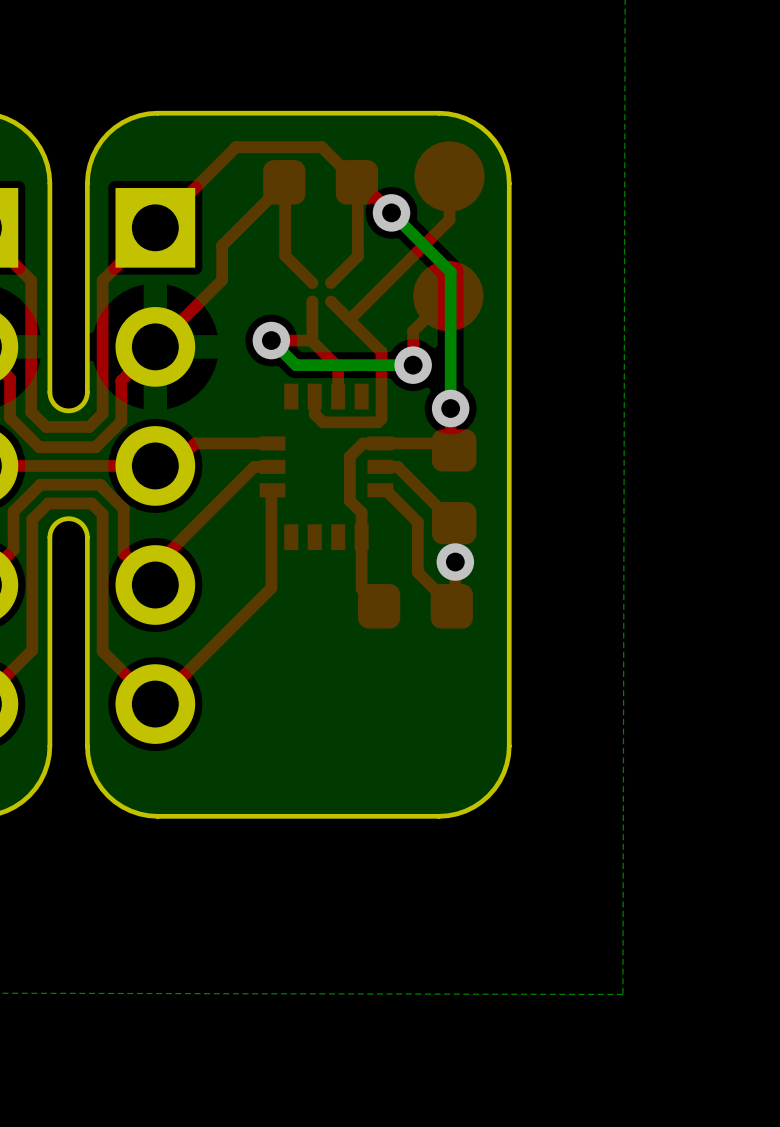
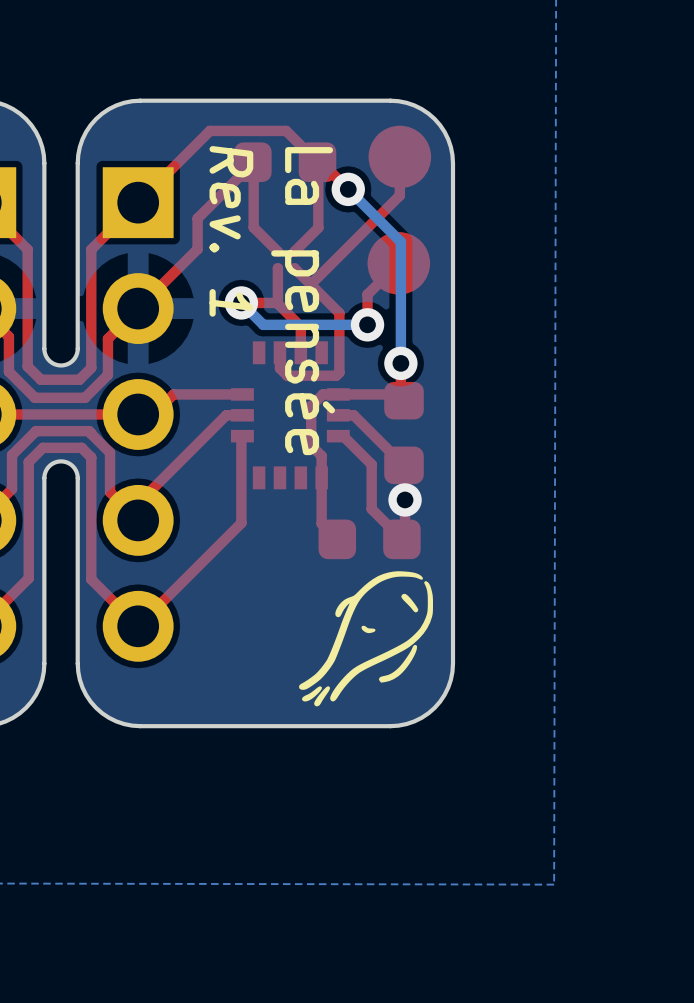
text: none -> Rev. 1 (231, 231)
text: none -> La pensée (303, 301)
drawing: none -> [299, 571, 434, 707]

